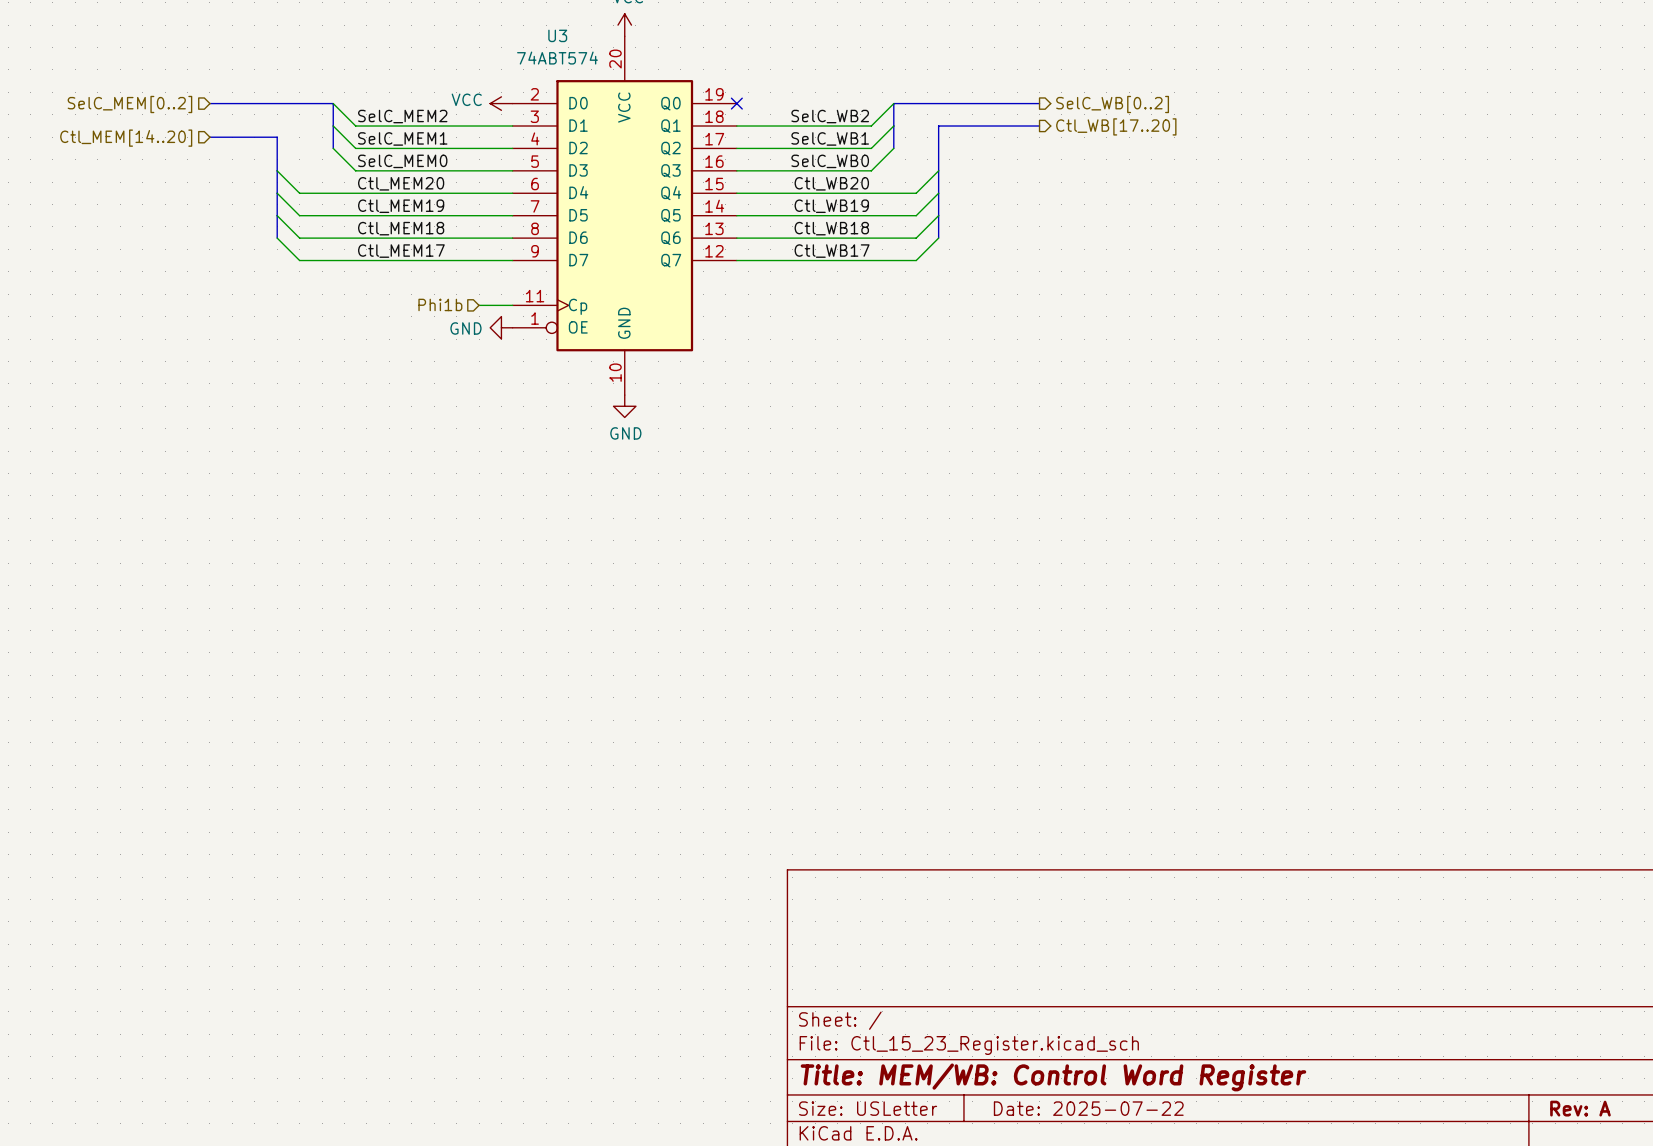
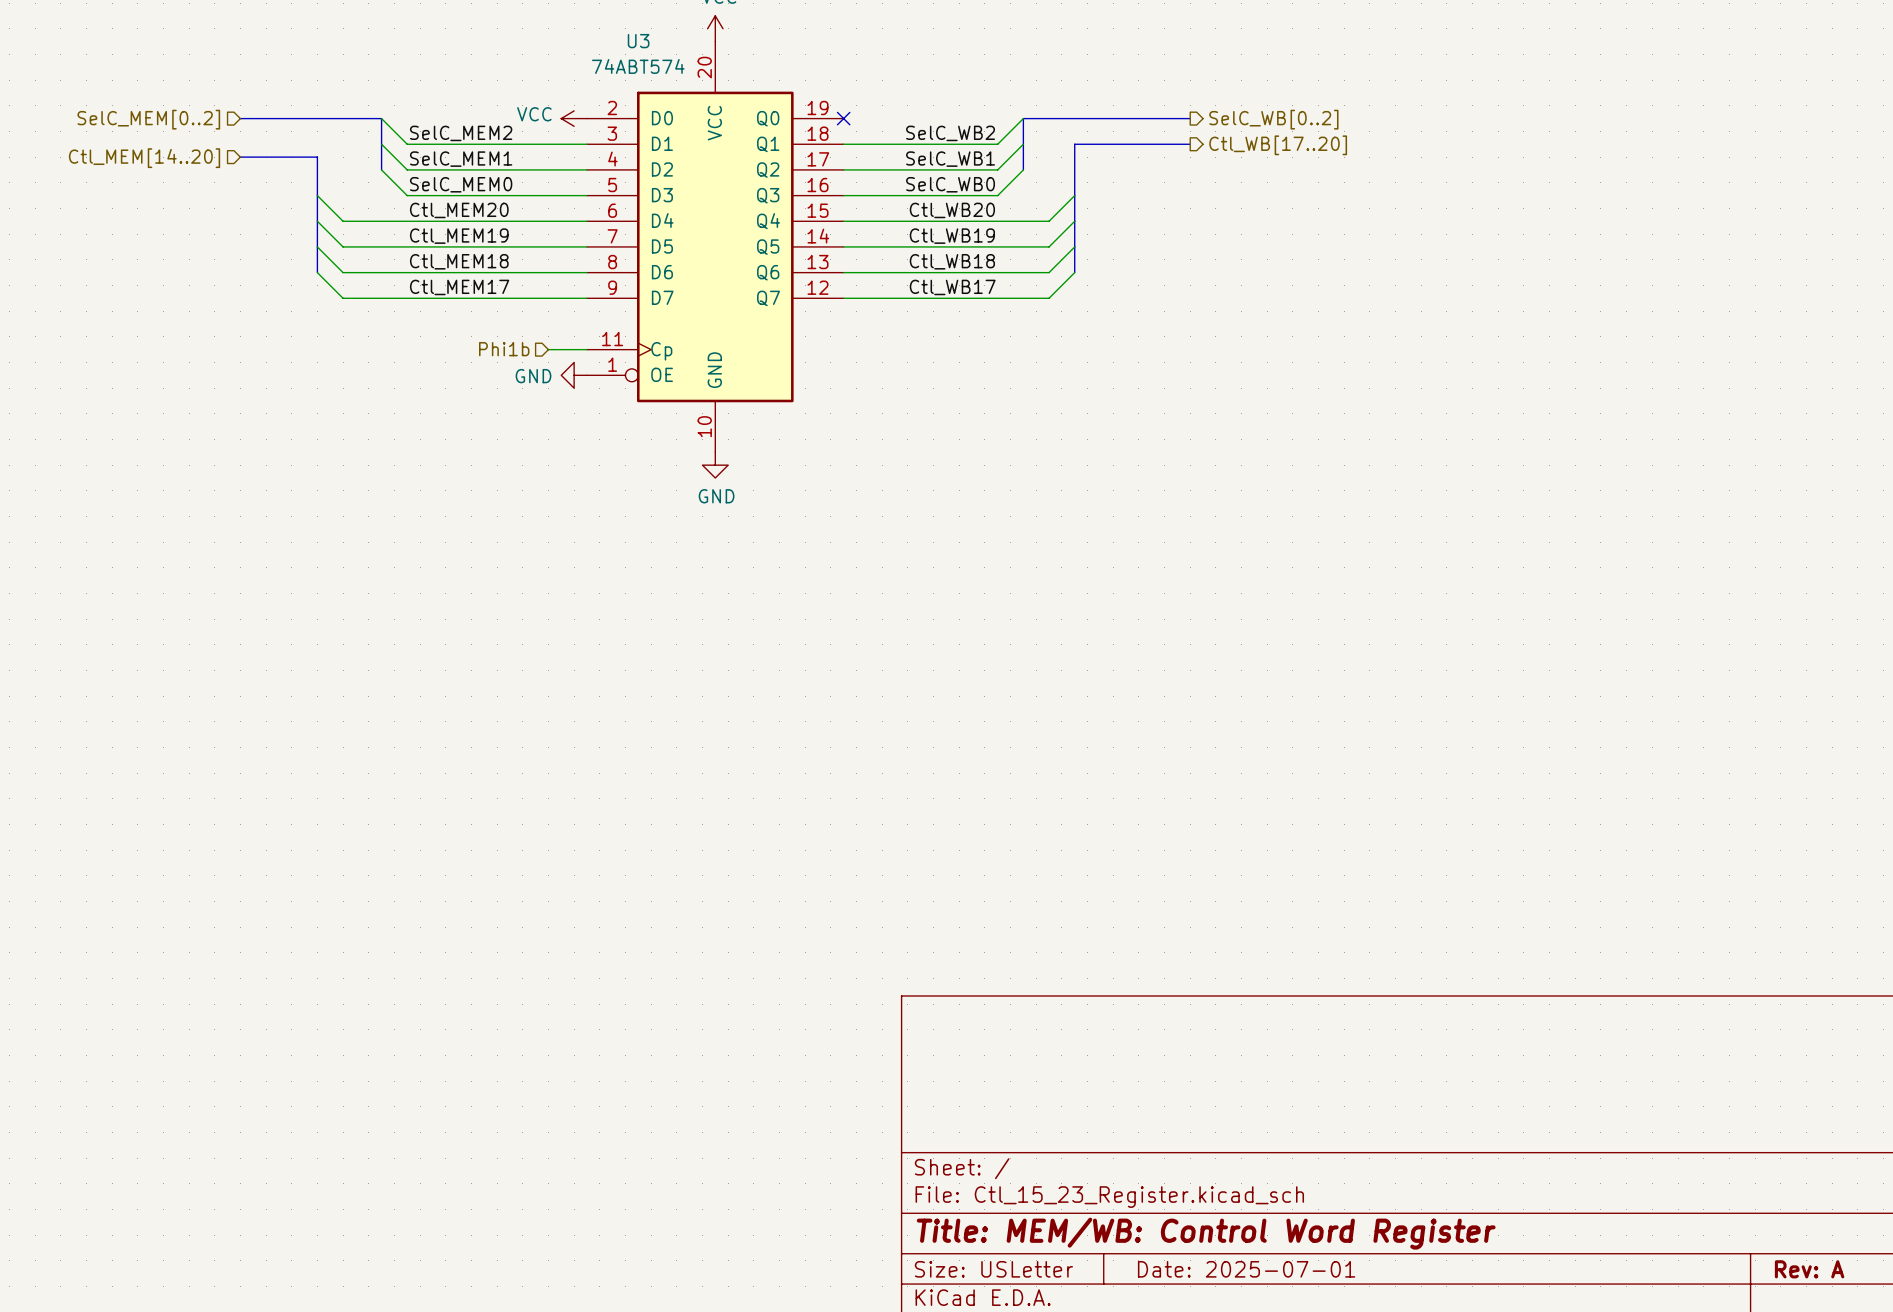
title block: Date: 2025-07-22 (1088, 1108) -> Date: 2025-07-01 (1246, 1269)

